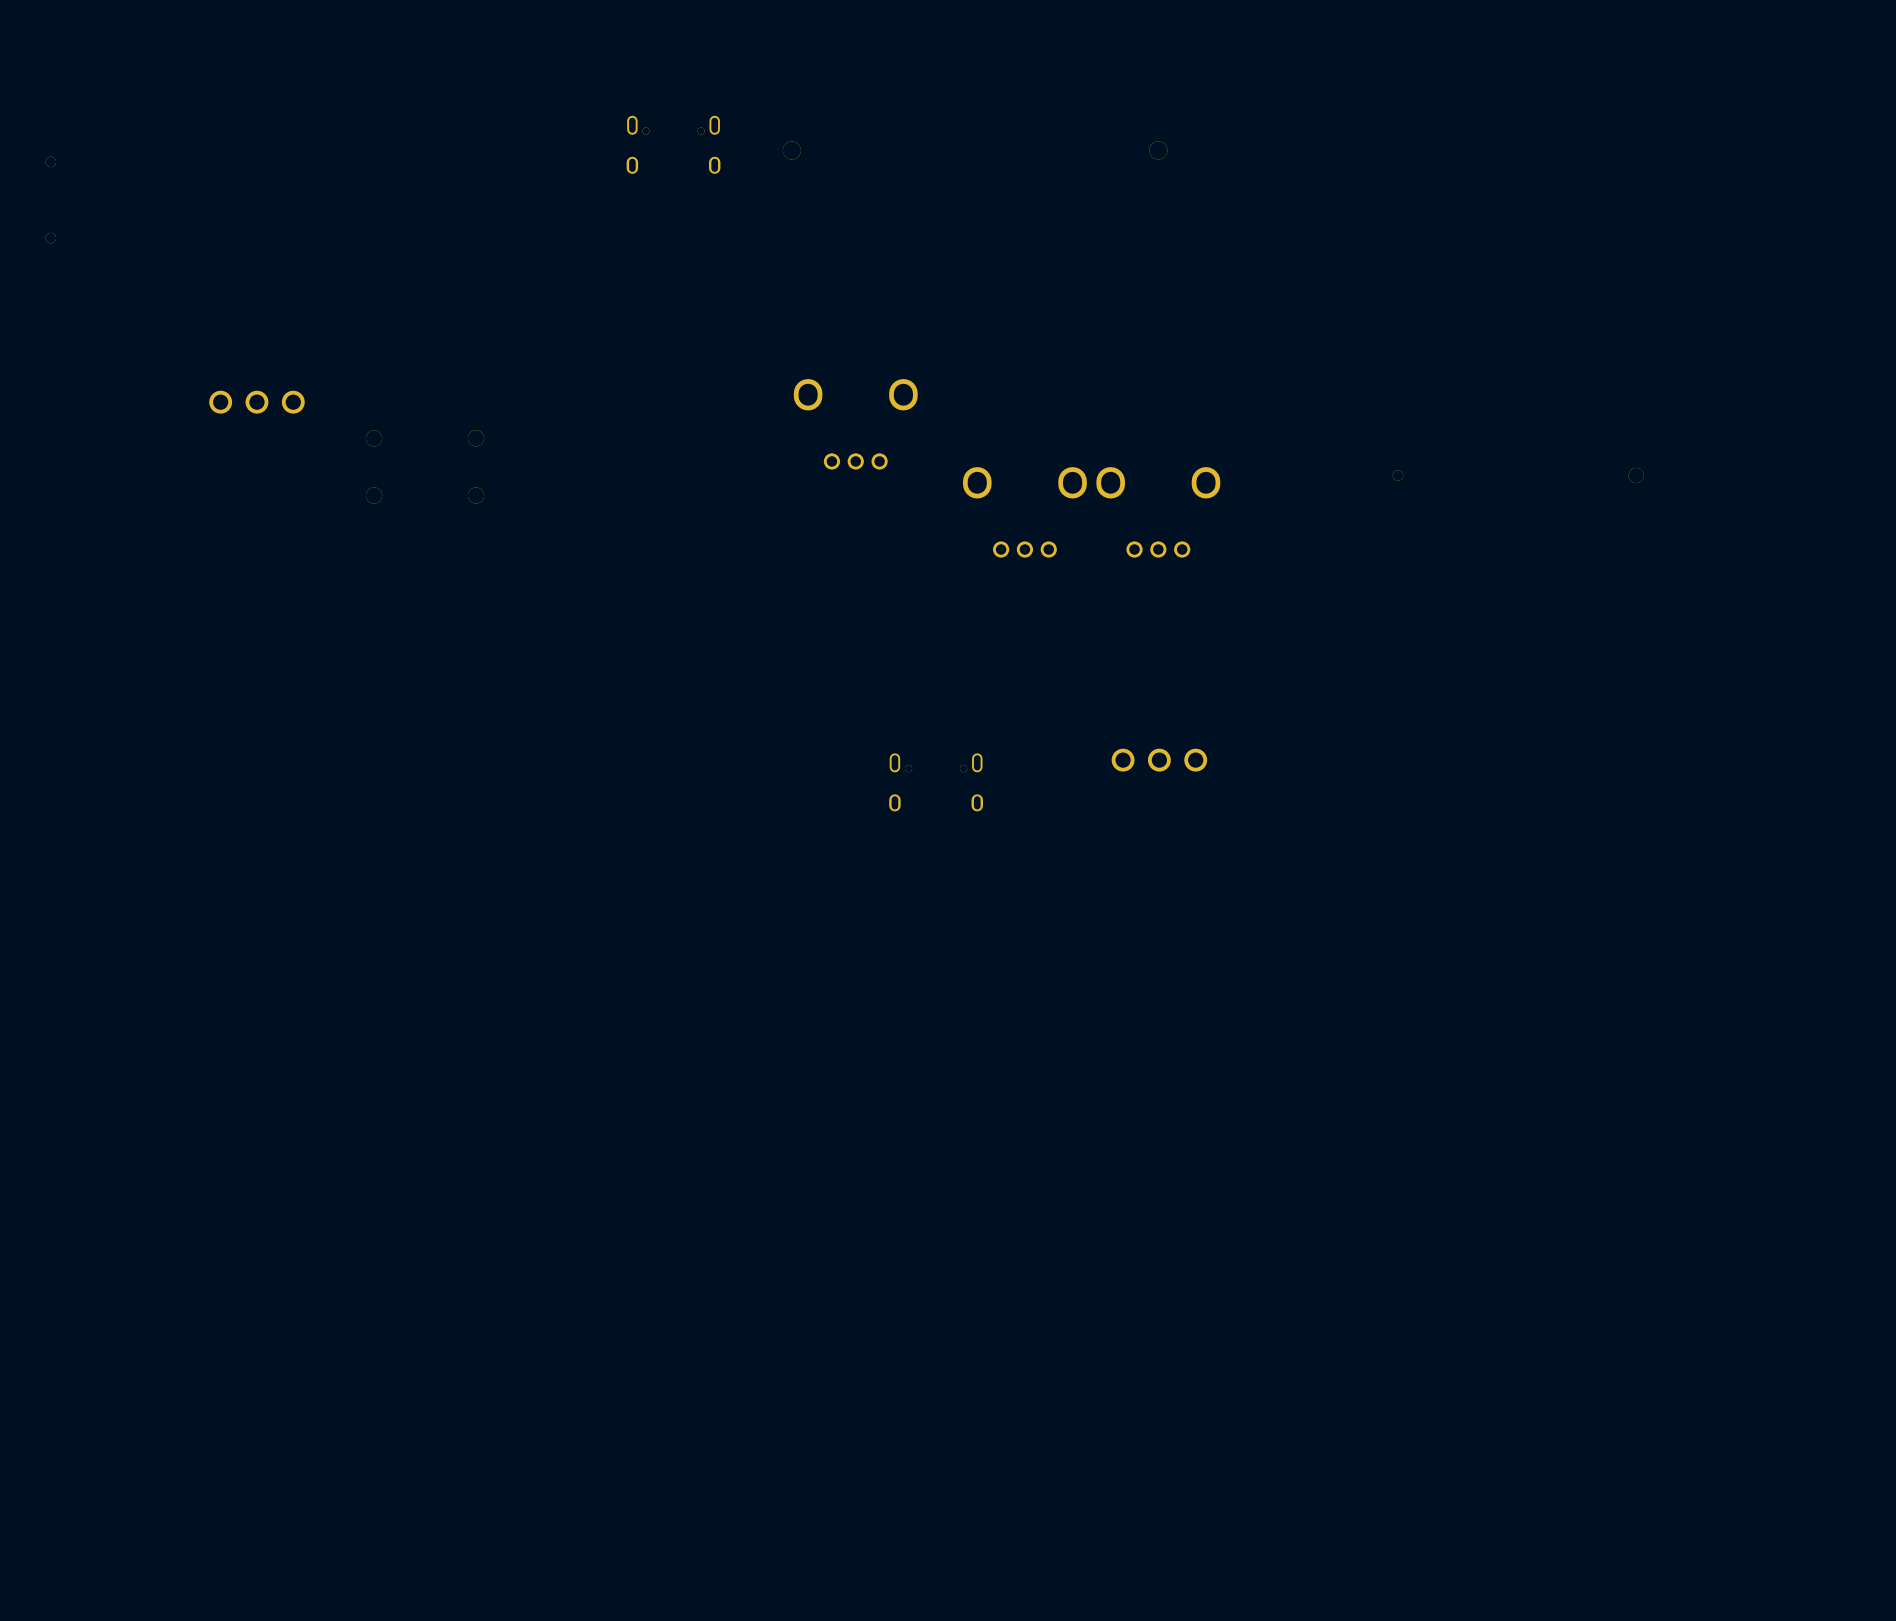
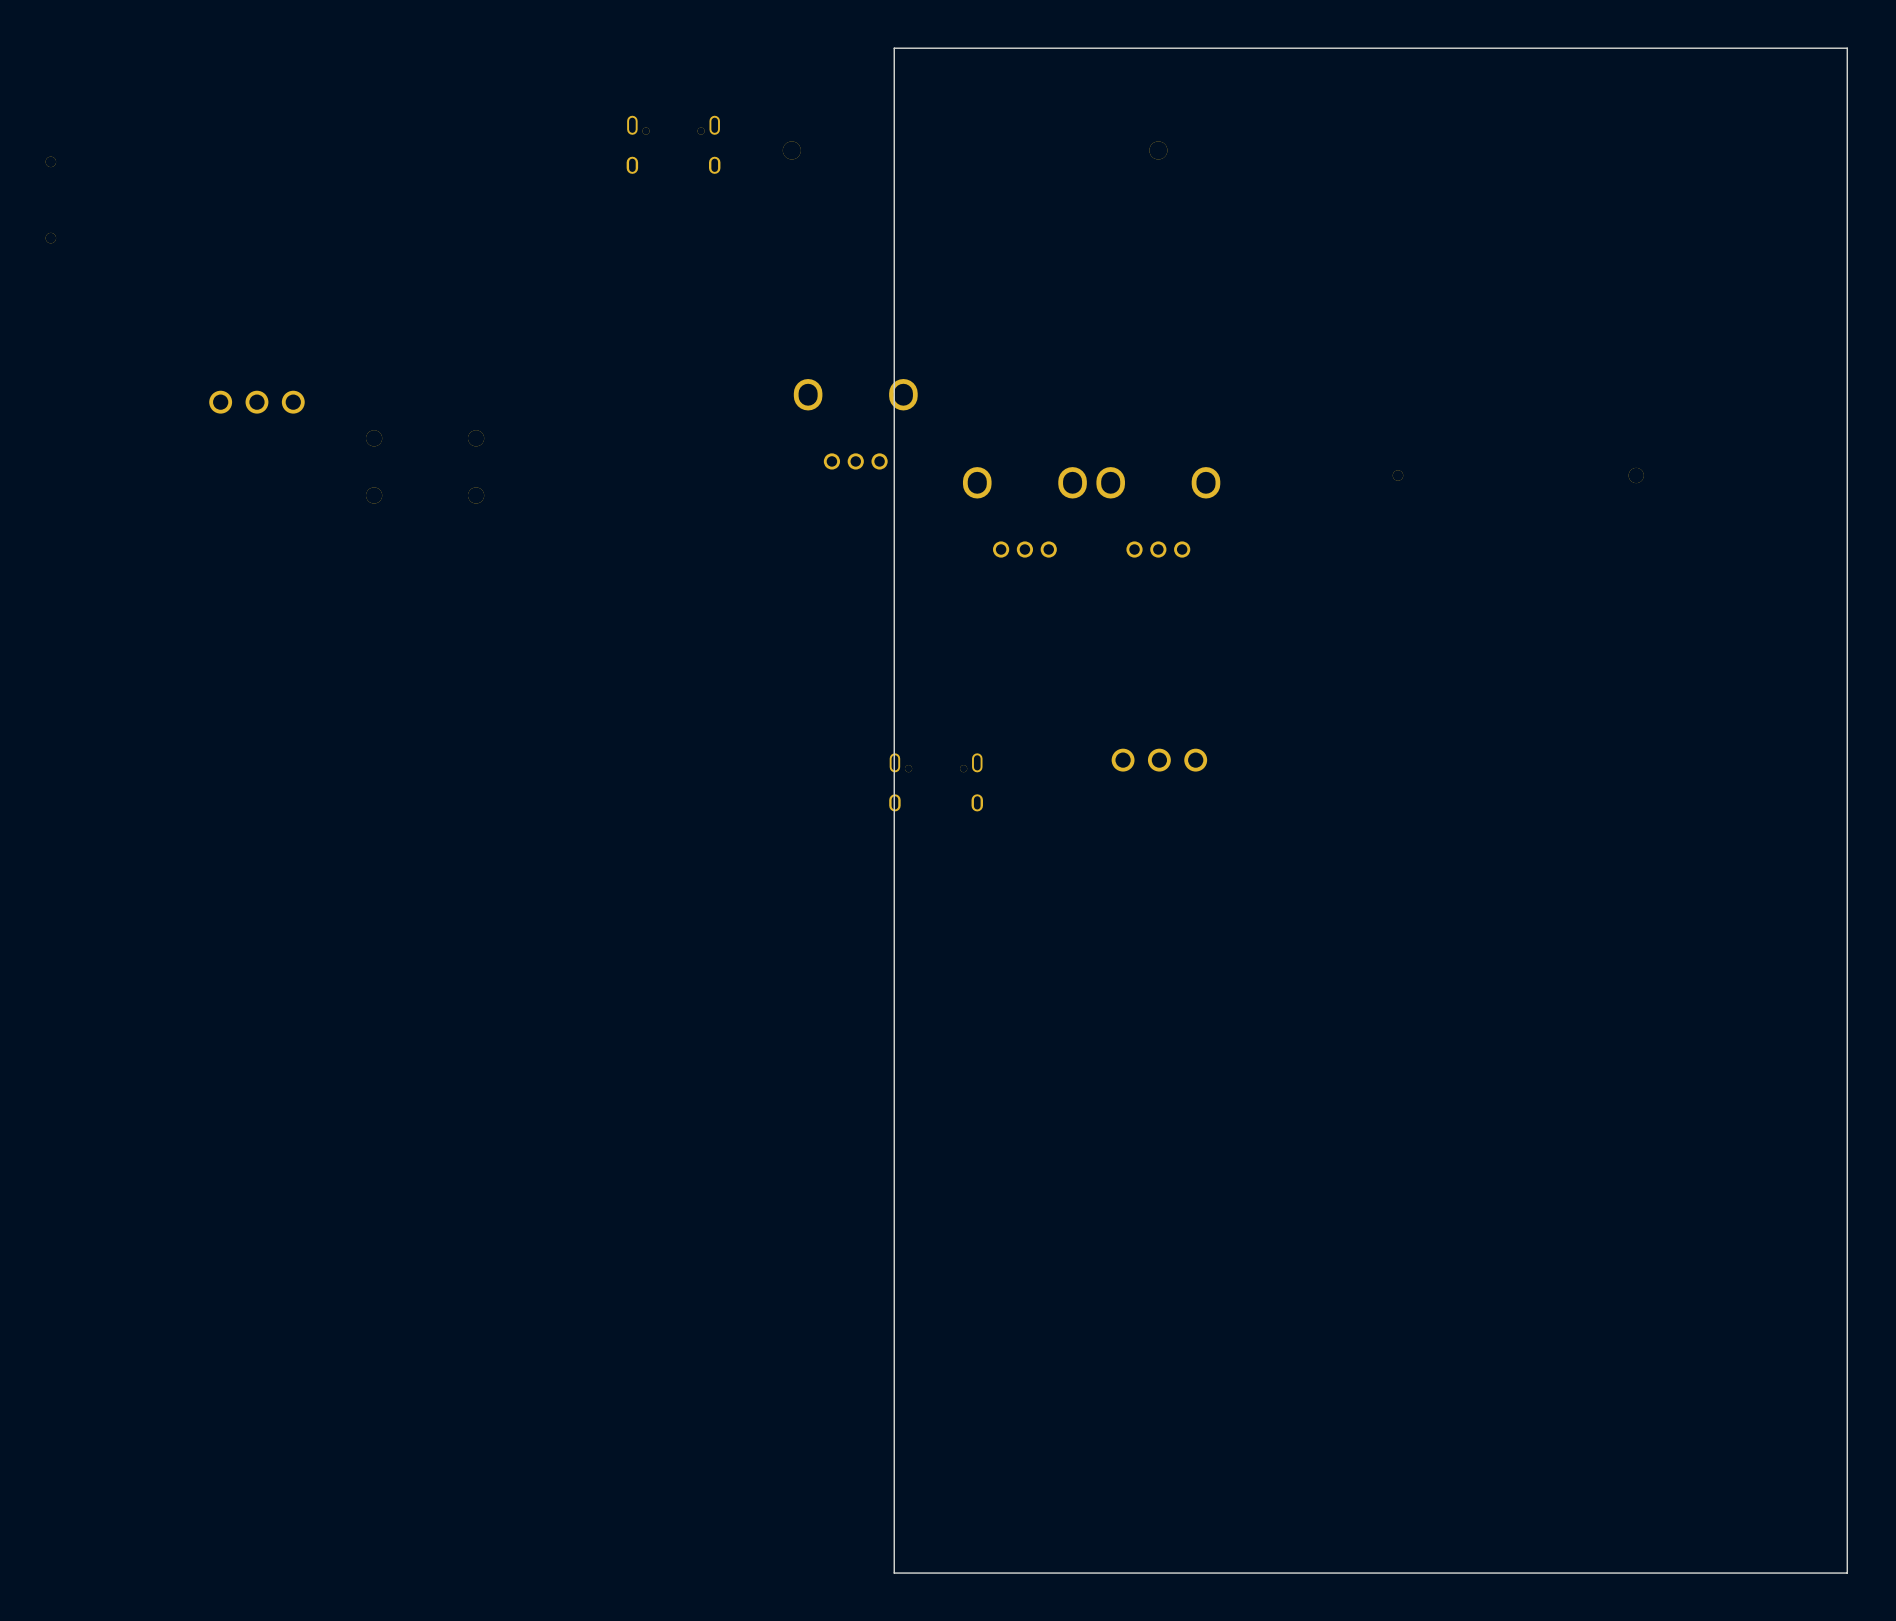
board edge: none -> (1847, 48) (894, 48) (894, 1573) (1847, 1573) (1847, 48)

